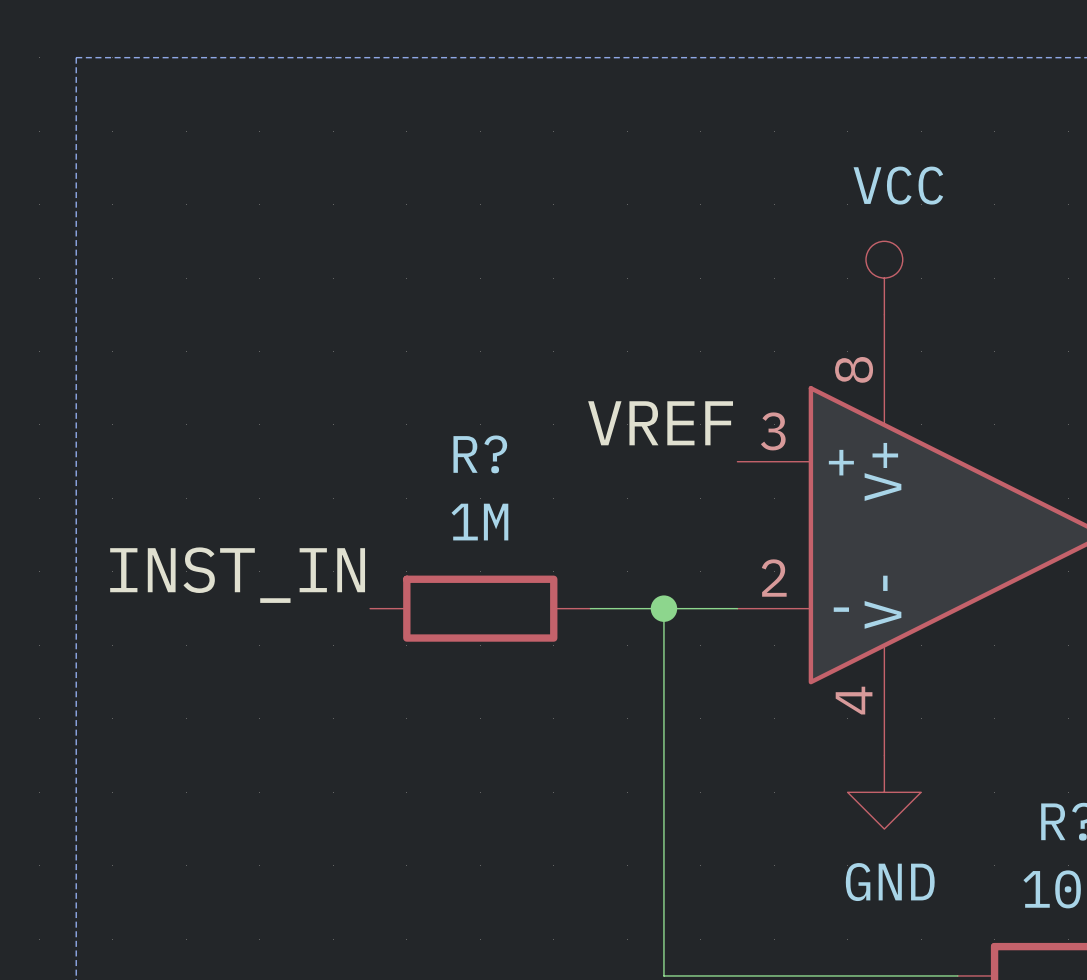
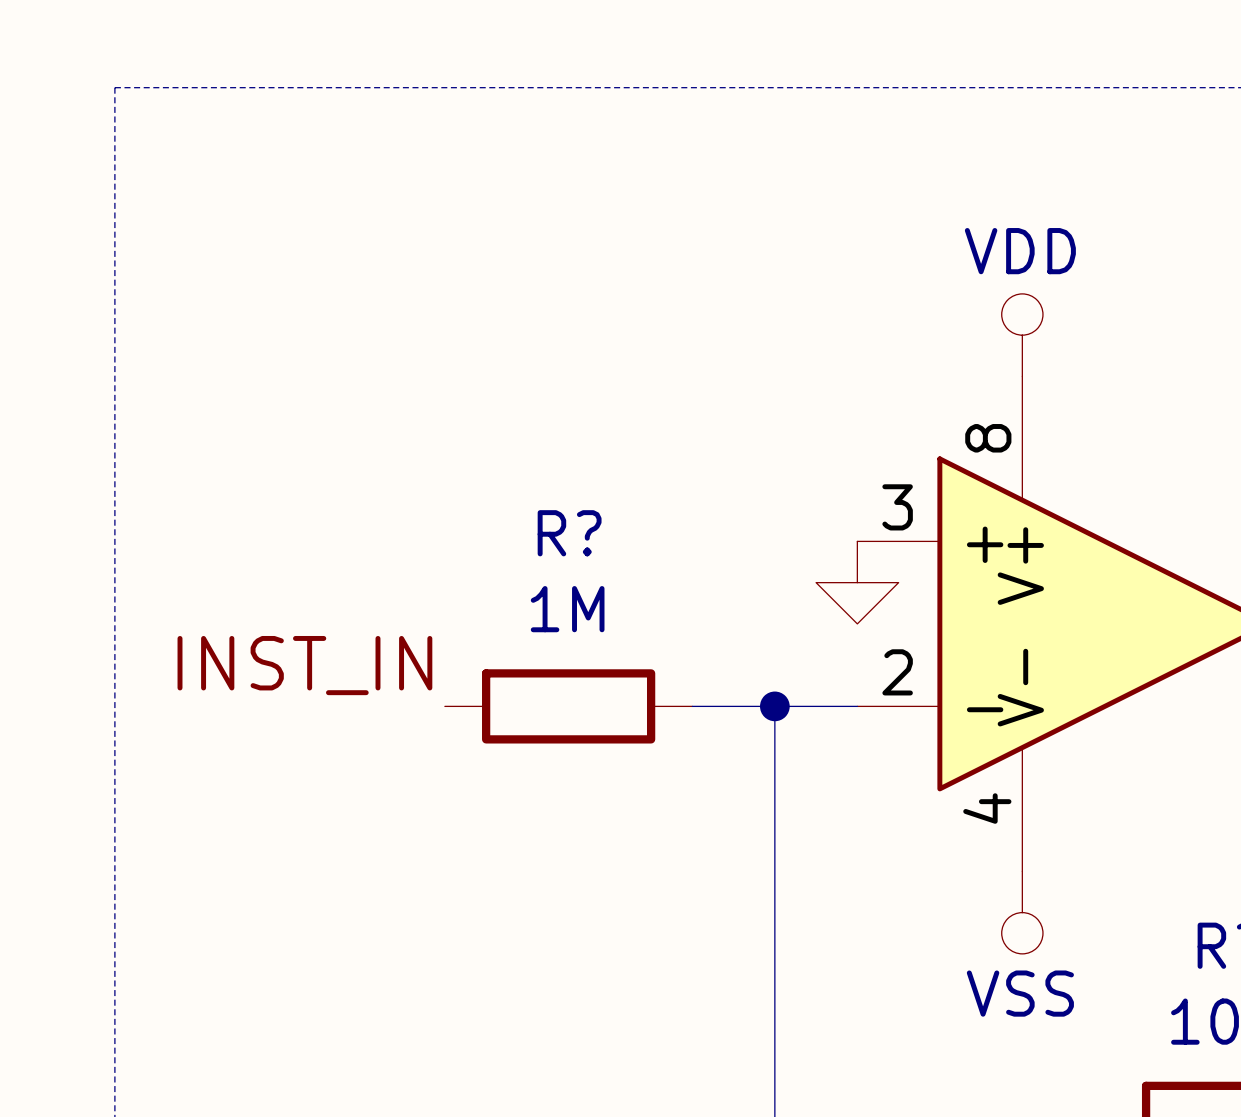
power symbol: VCC (884, 278) -> VDD (1022, 335)
label: VREF (660, 423) -> none
power symbol: none -> (857, 582)
power symbol: GND (884, 792) -> VSS (1022, 912)

